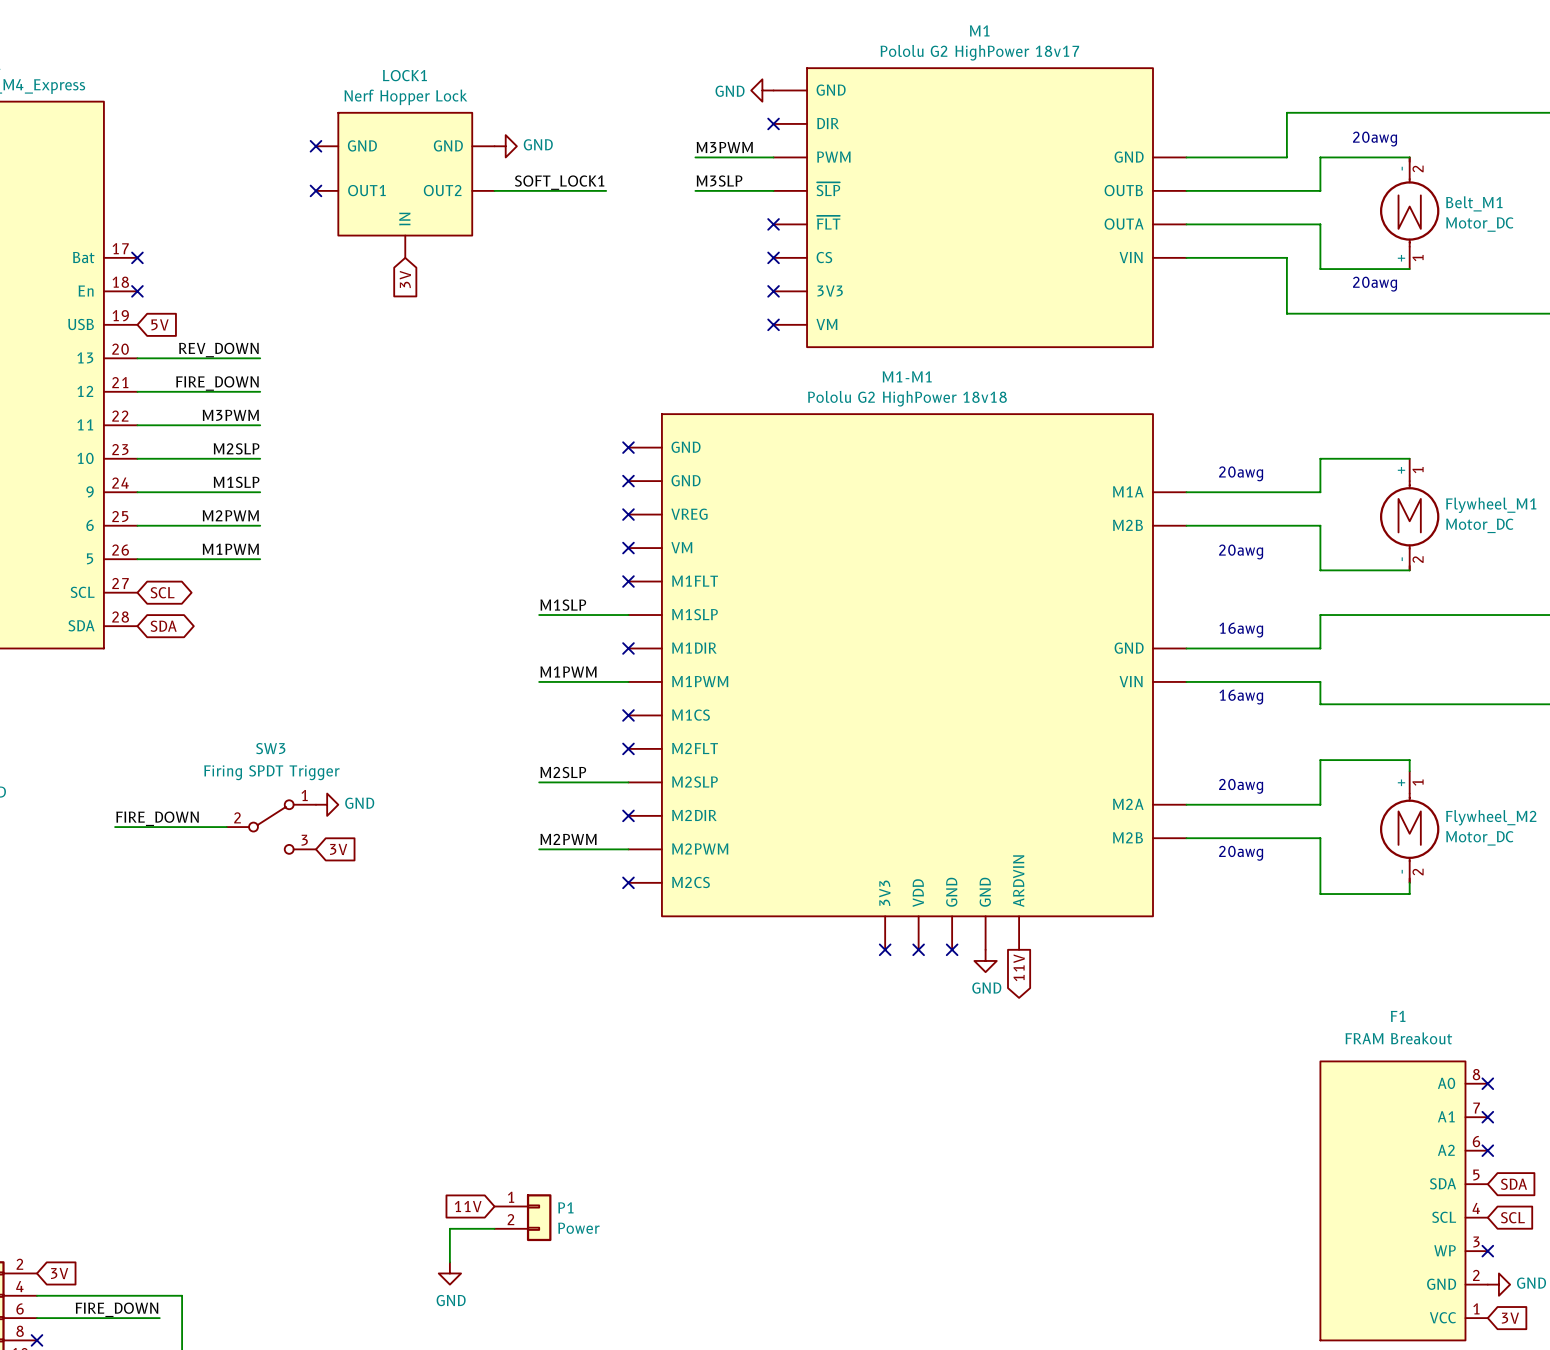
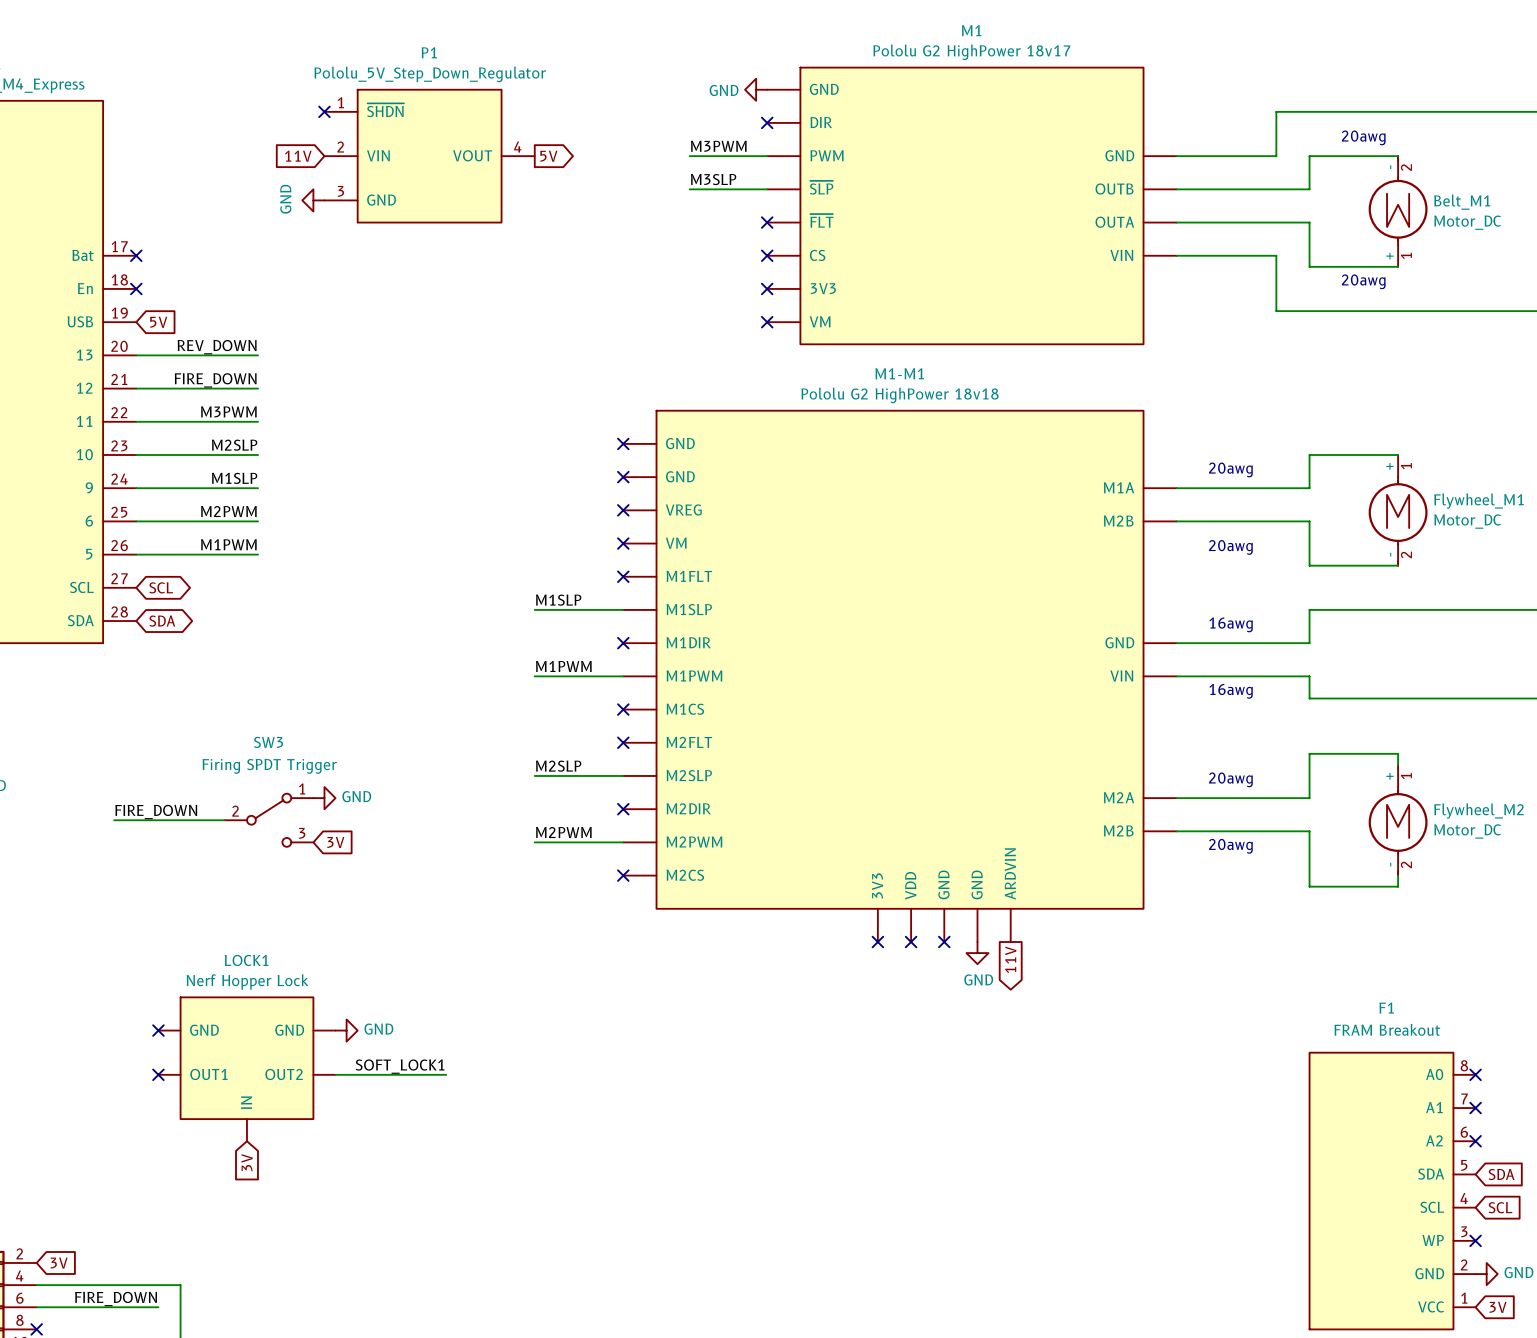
no-connect mark position: (315, 146) -> (324, 111)
power symbol rotation: 0° (505, 146) -> 180° (313, 200)
power symbol position: GND (505, 146) -> GND (313, 200)
global label: none -> 11V (298, 156)
global label: none -> 5V (548, 156)
label: SOFT_LOCK1 (559, 182) -> none
LOCK1 position: (405, 185) -> (246, 1069)
no-connect mark: (315, 190) -> none
wire: (494, 190) (606, 190) -> none
global label: 3V (405, 279) -> none
no-connect mark: none -> (158, 1030)
power symbol: none -> GND (346, 1030)
label: none -> SOFT_LOCK1 (400, 1066)
no-connect mark: none -> (158, 1074)
wire: none -> (335, 1074) (446, 1074)
global label: none -> 3V (247, 1162)
P1 symbol: [494, 1194, 552, 1242] -> [324, 89, 535, 223]
global label: 11V (468, 1206) -> none
P1 name position: P1 (565, 1207) -> P1 (429, 52)
wire: (494, 1228) (449, 1228) (449, 1262) -> none
P1 value: Power (578, 1228) -> Pololu_5V_Step_Down_Regulator (430, 74)
power symbol: GND (449, 1273) -> none

